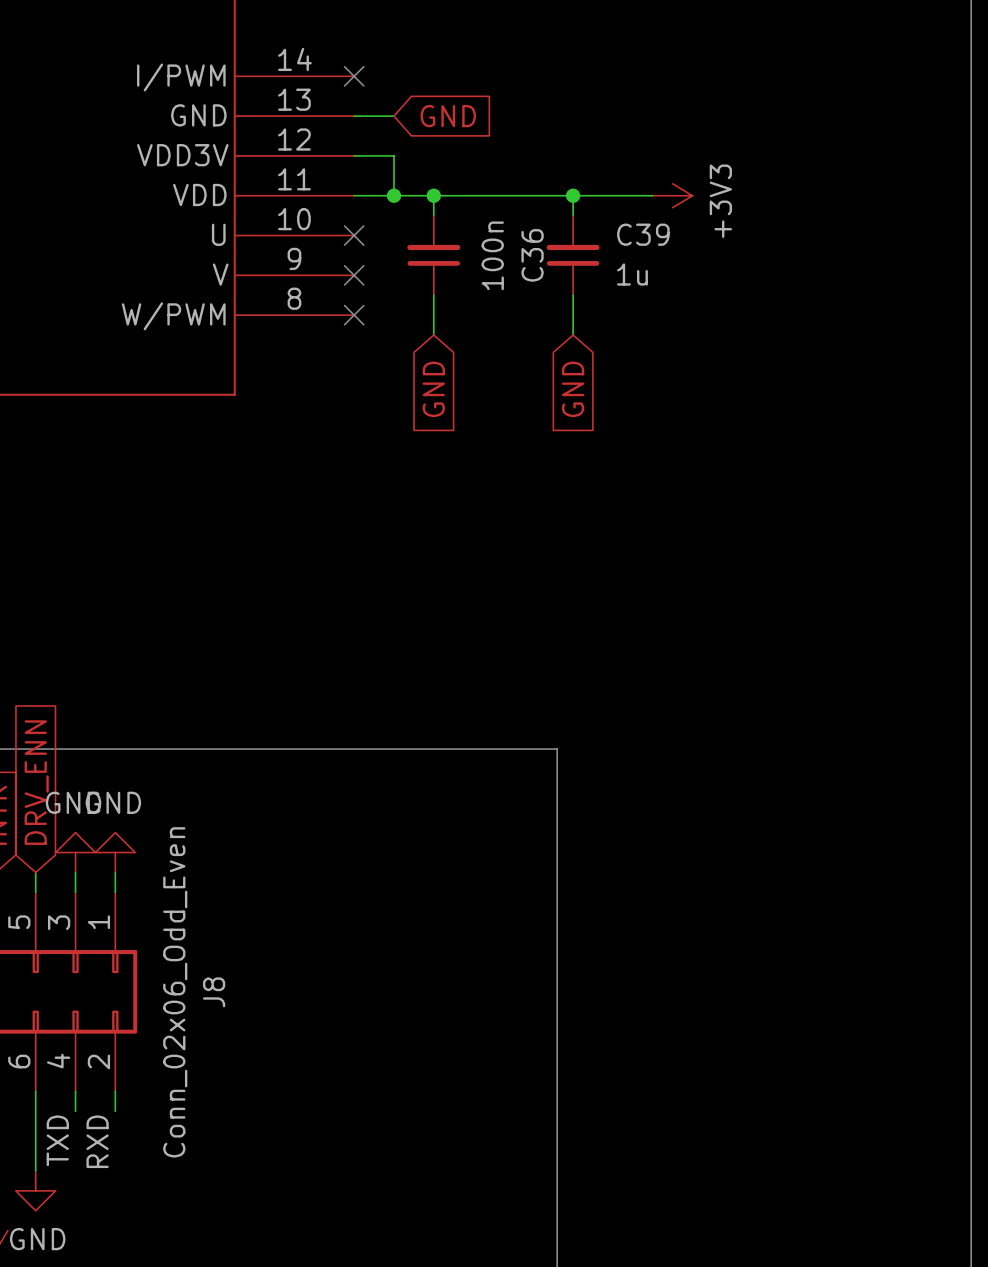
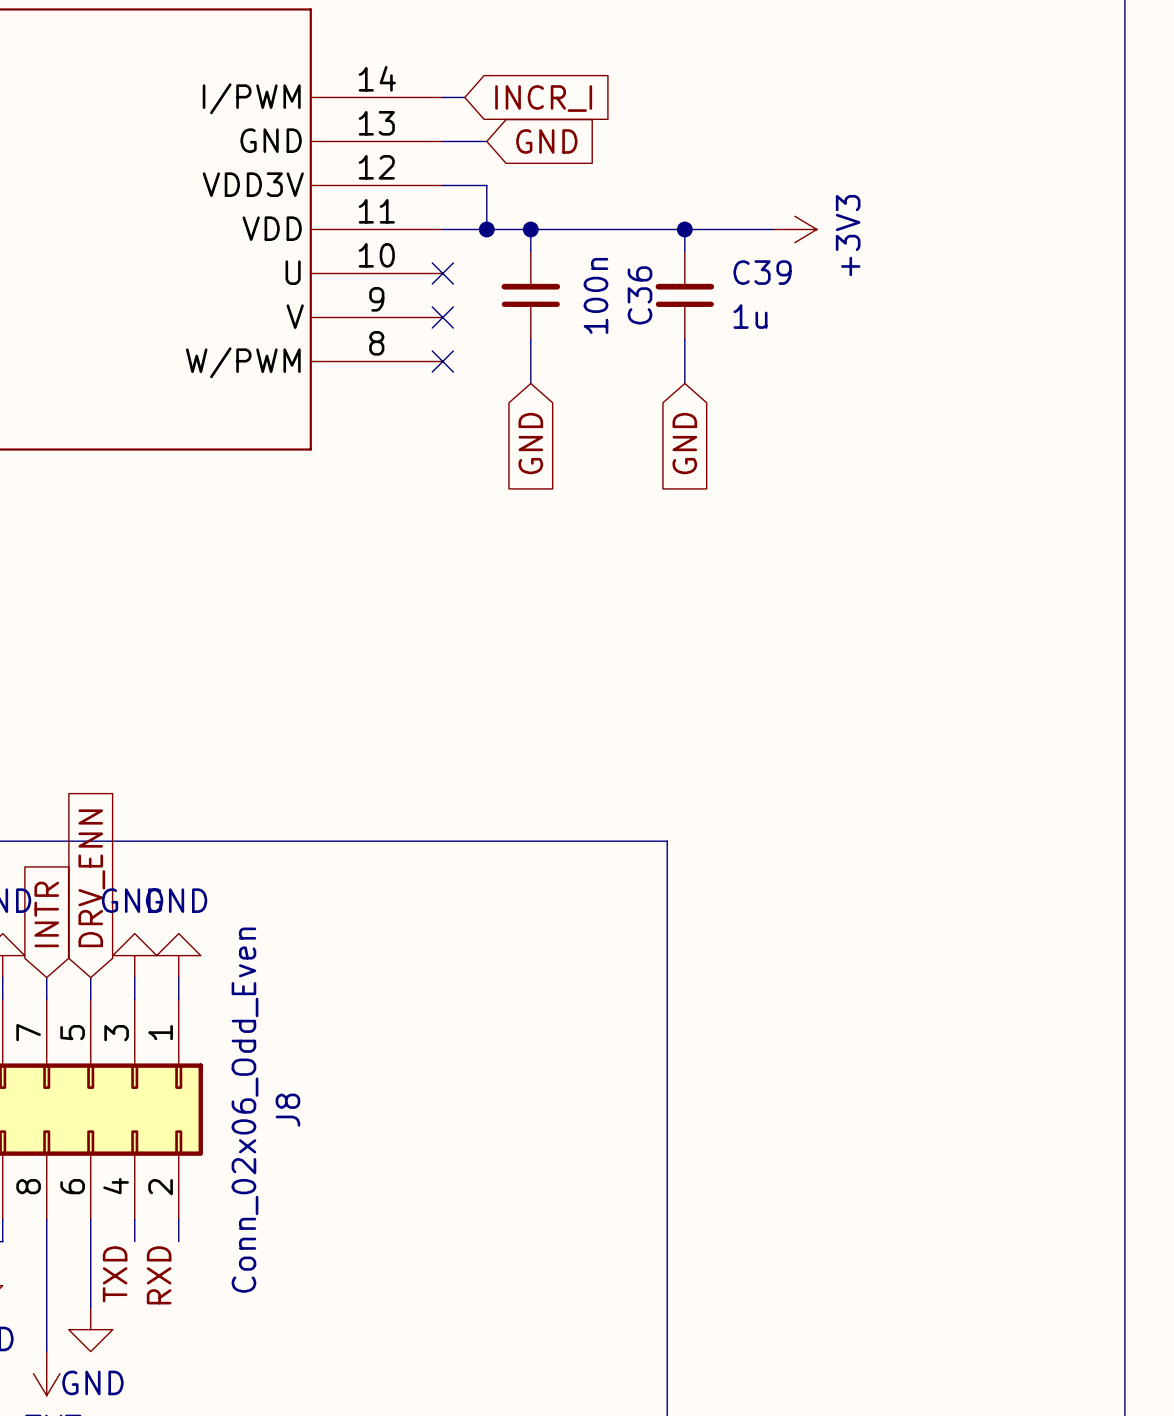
wire: none -> (442, 97) (464, 97)
no-connect mark: (354, 76) -> none
global label: none -> INCR_I (543, 98)

